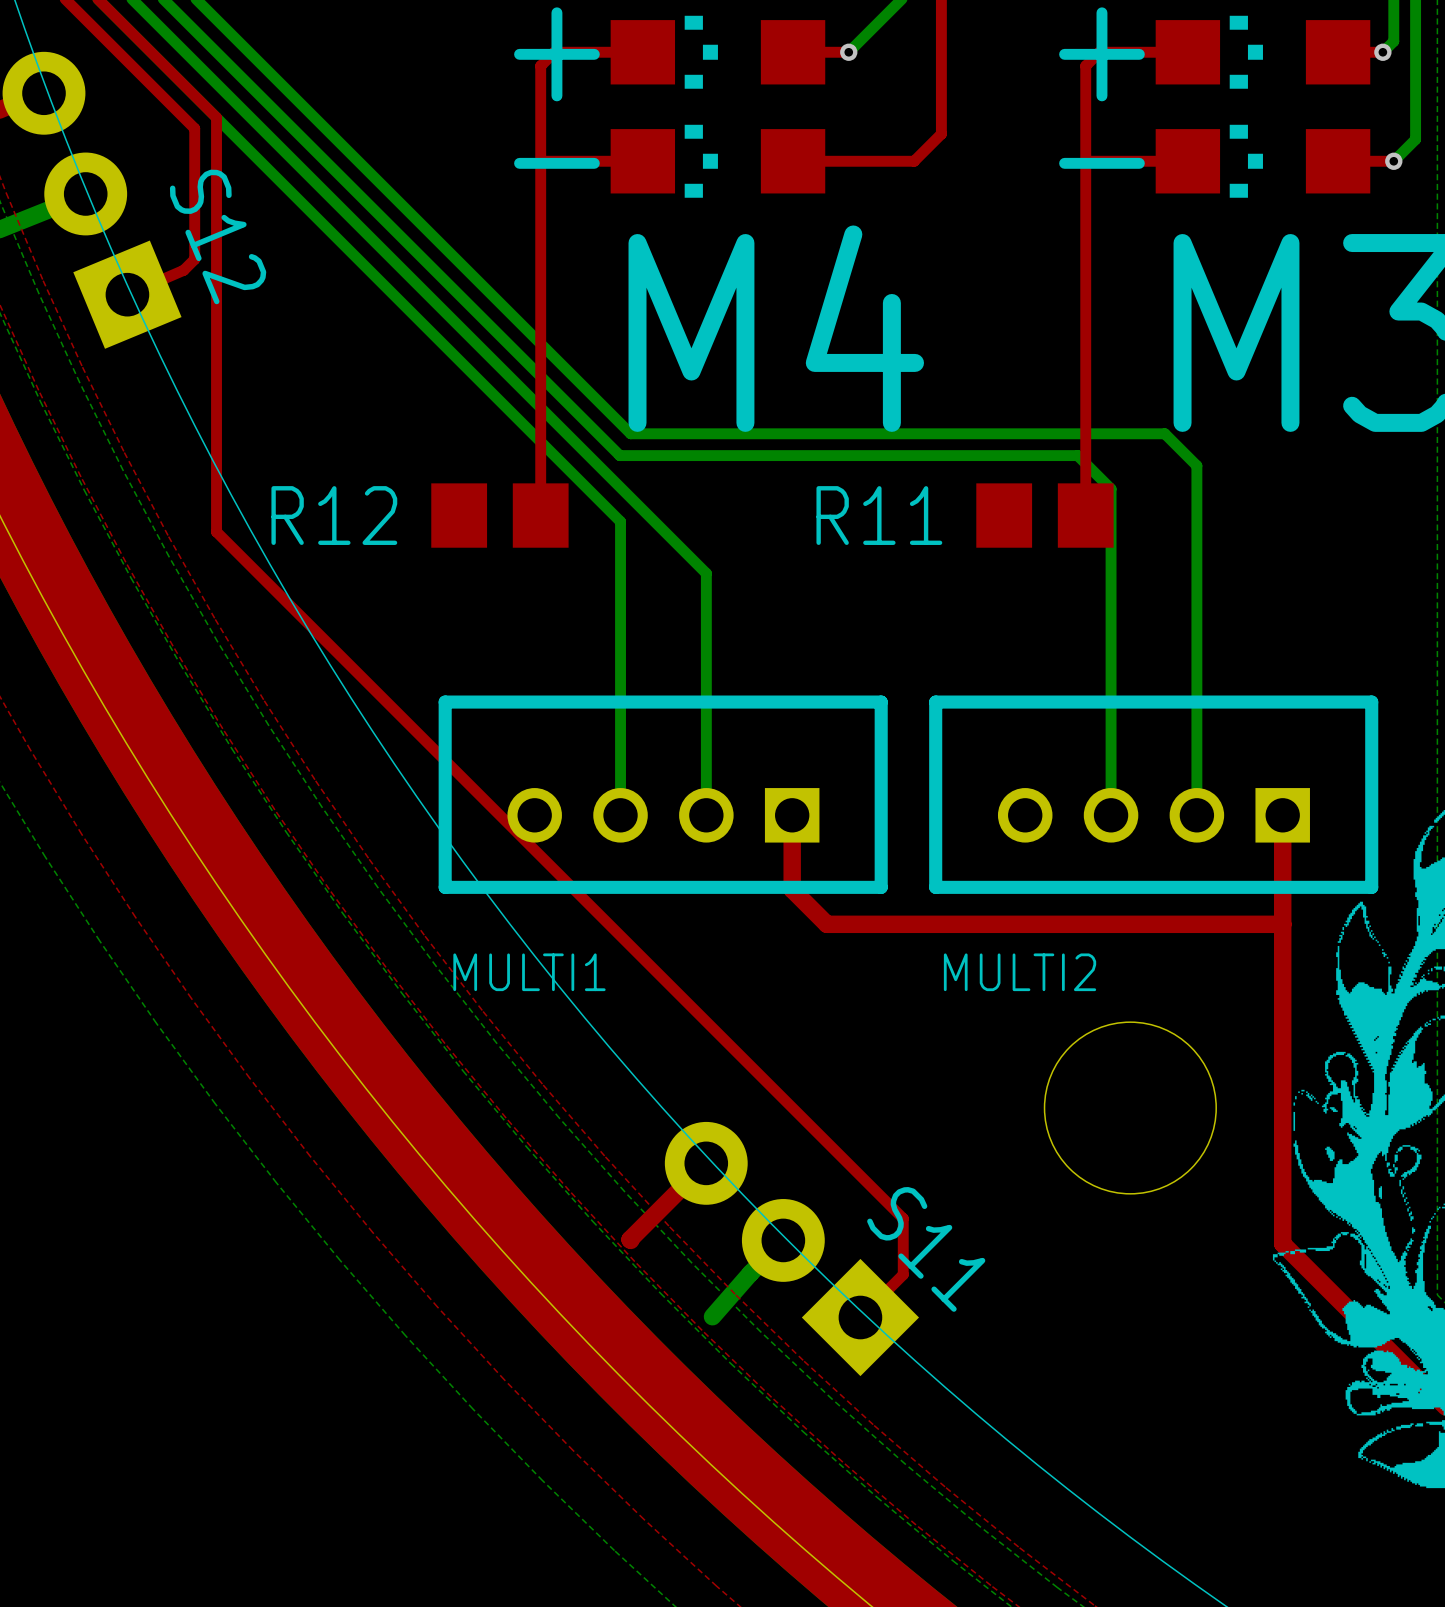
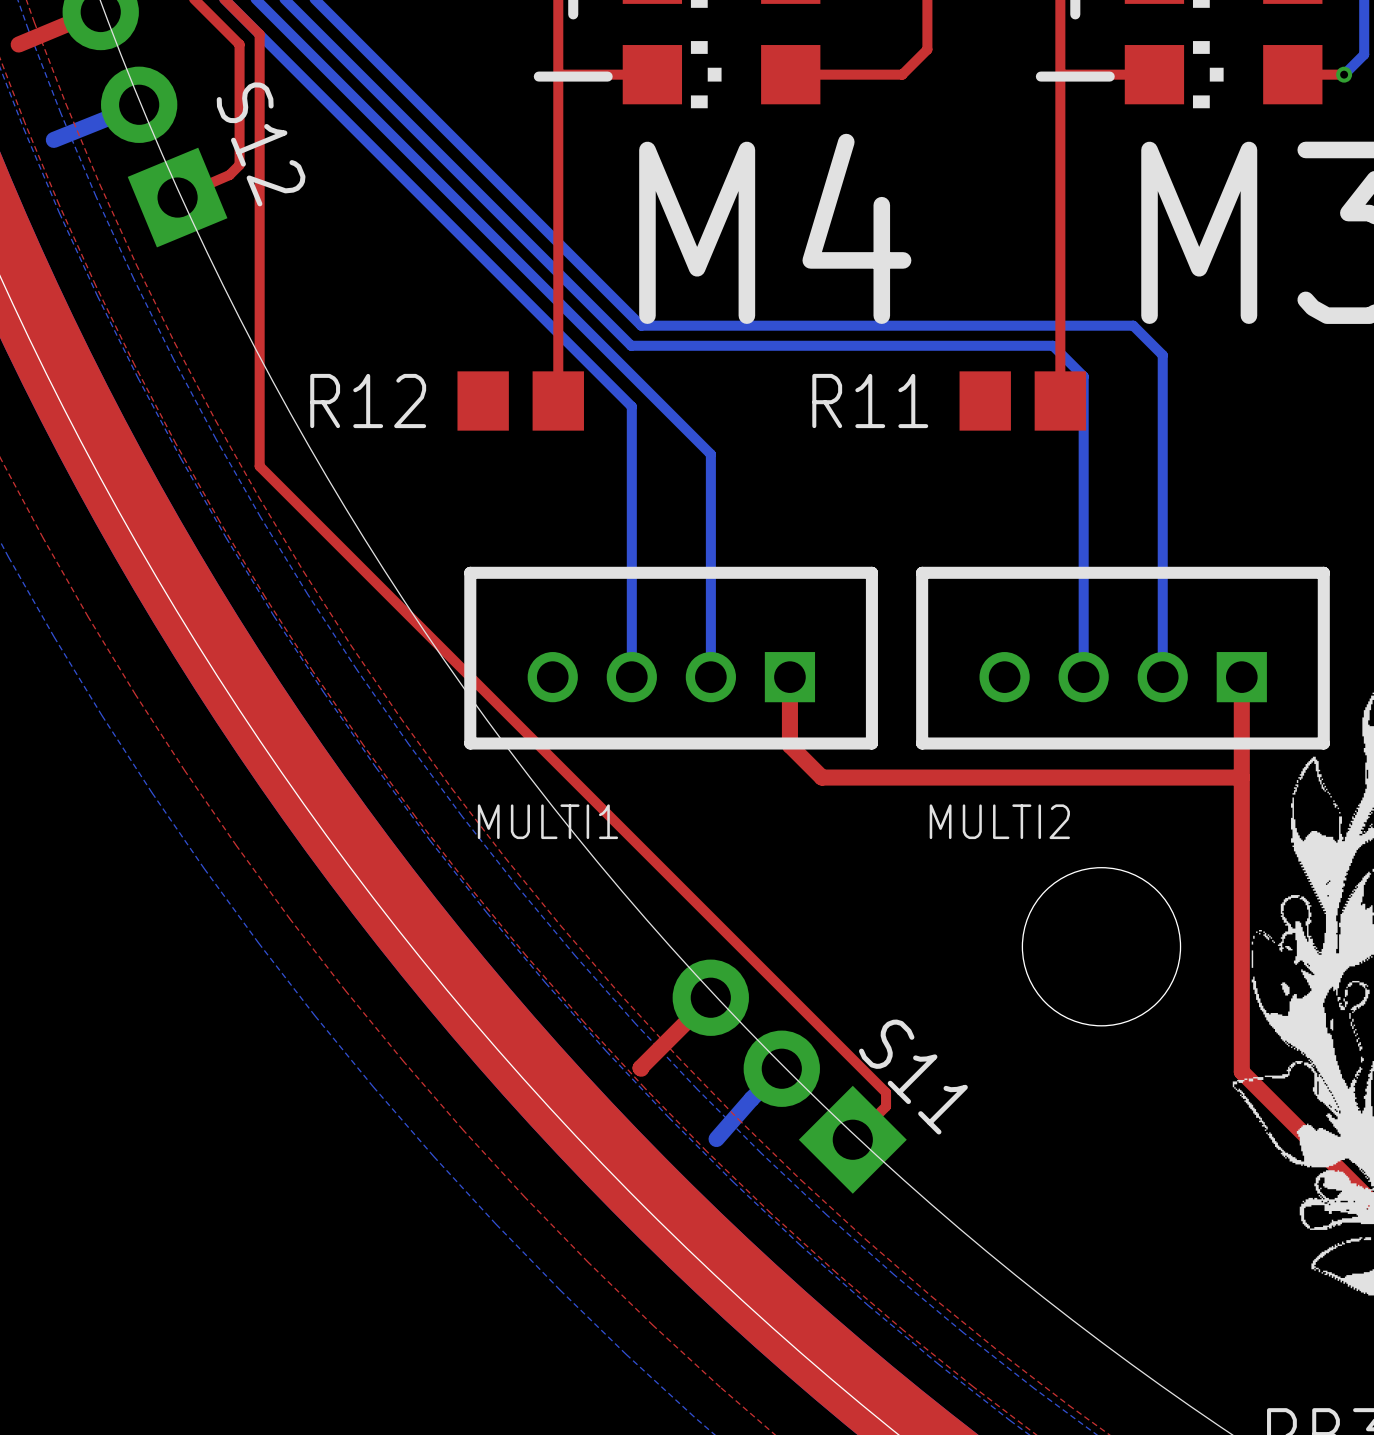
top track: (216, 531) (903, 1218) (903, 1274) (896, 1281) -> (259, 416) (259, 466) (886, 1092) (886, 1106)

